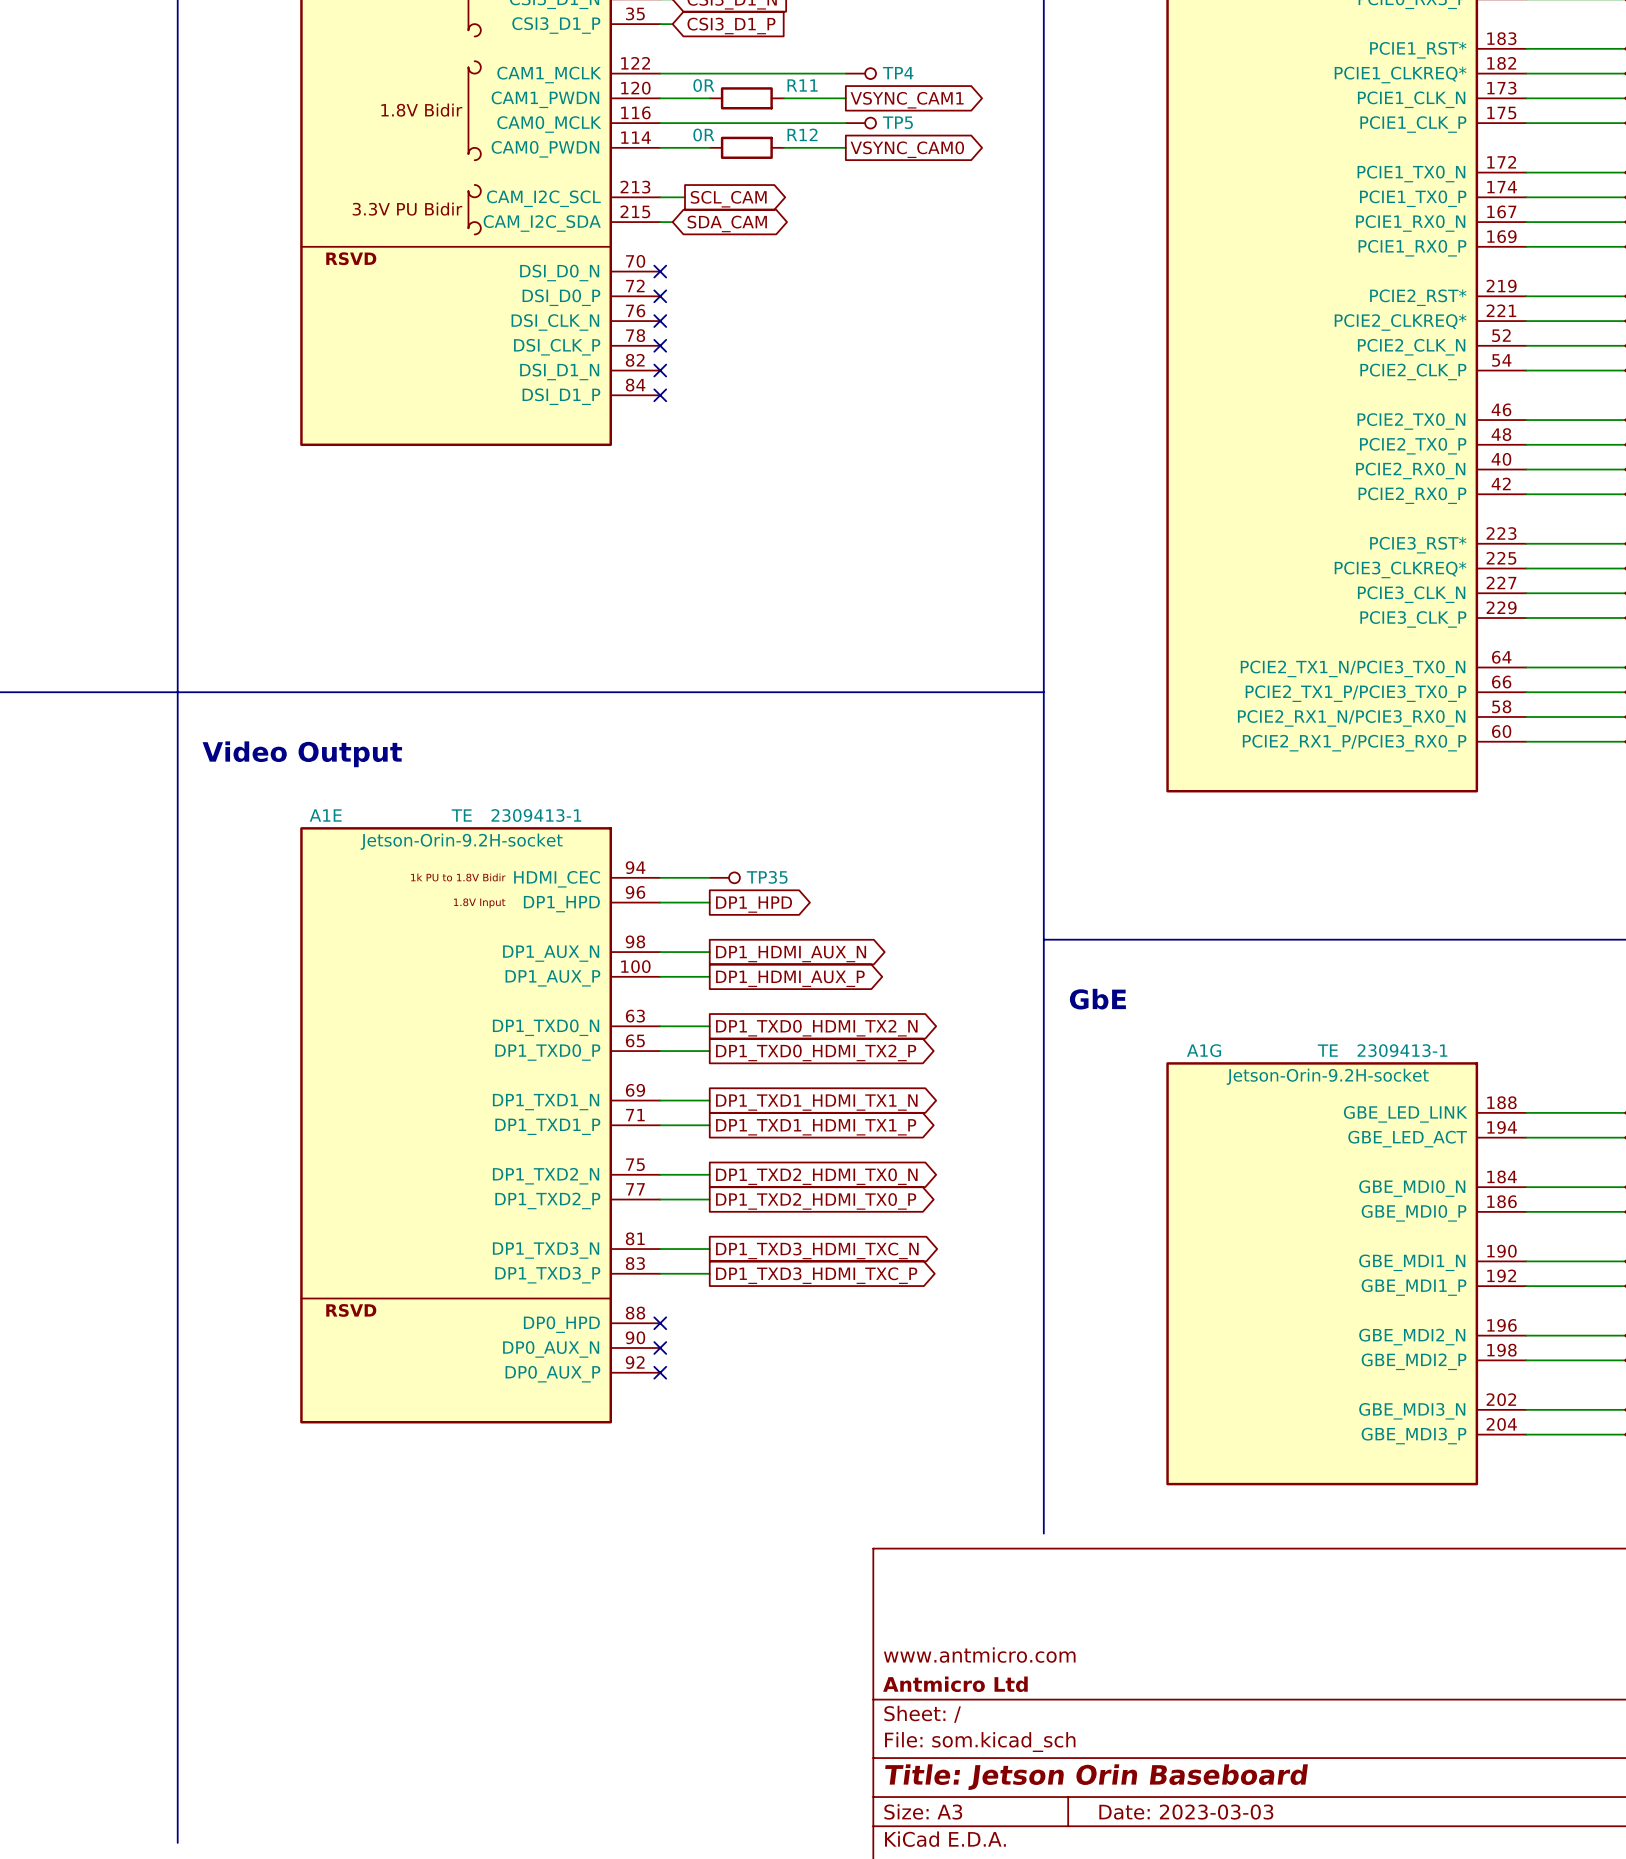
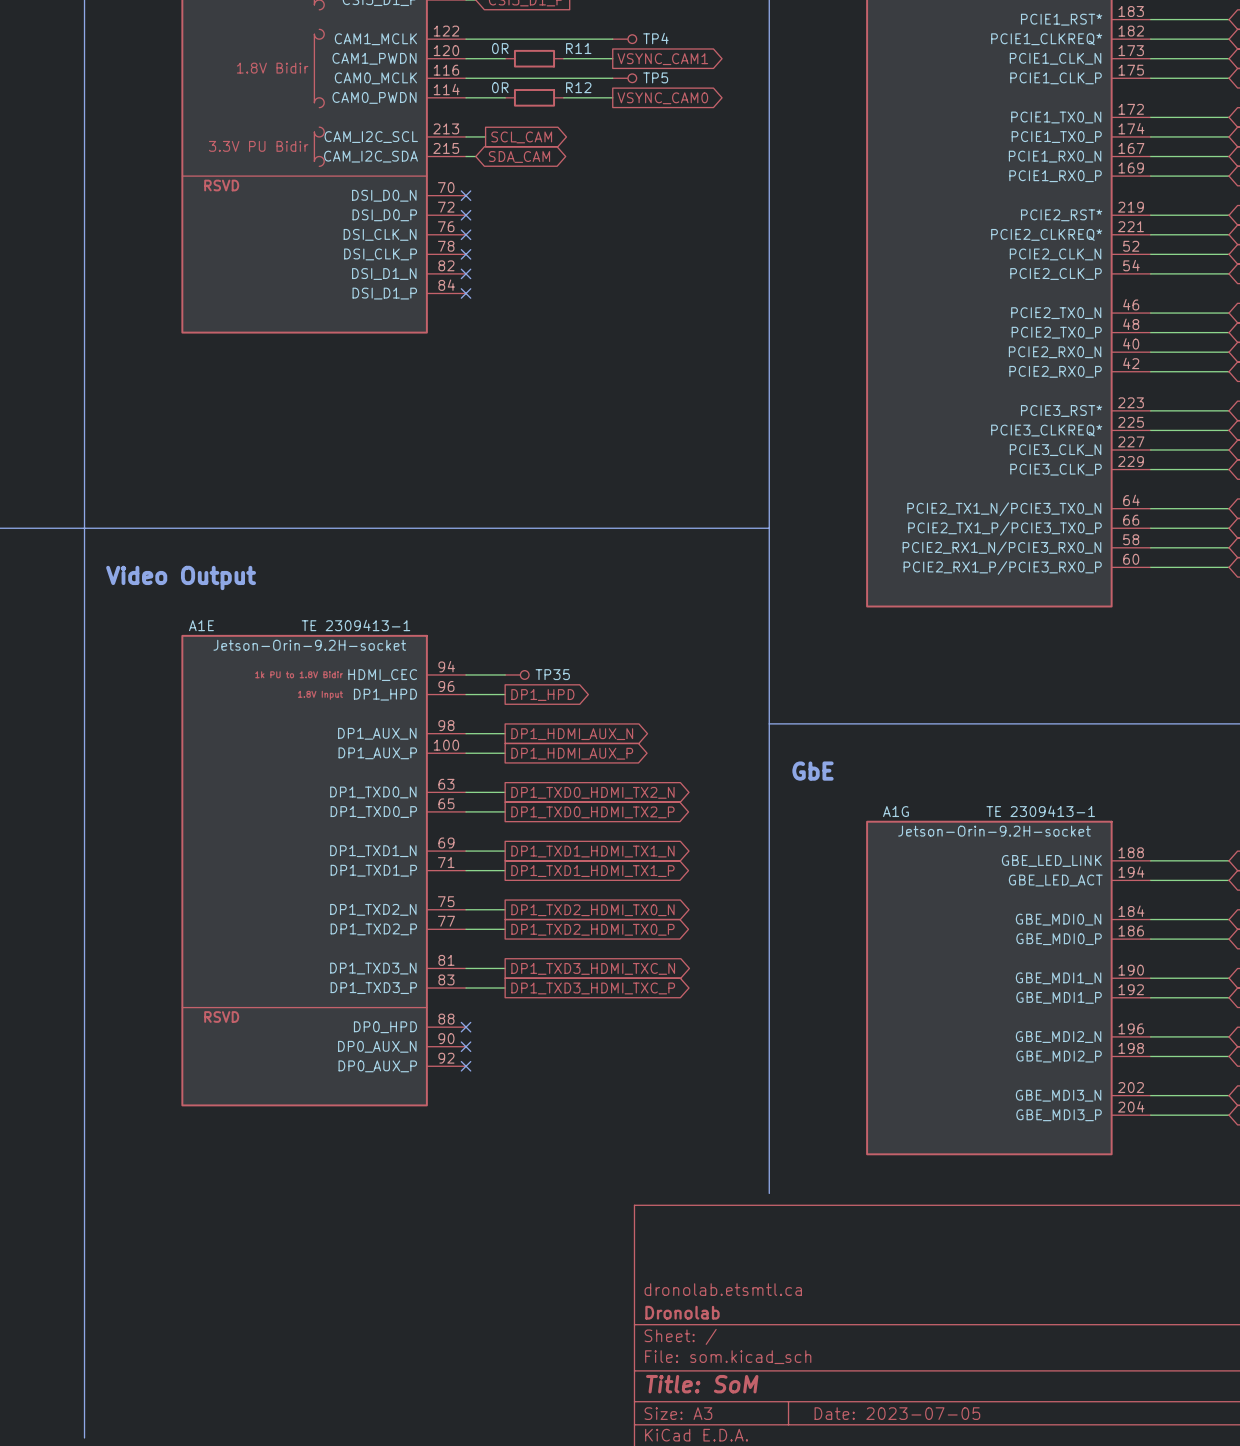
title block: www.antmicro.com (979, 1655) -> dronolab.etsmtl.ca (723, 1289)
title block: Antmicro Ltd (955, 1684) -> Dronolab (682, 1312)
title block: Title: Jetson Orin Baseboard (1096, 1777) -> Title: SoM (702, 1384)
title block: Date: 2023-03-03 (1186, 1812) -> Date: 2023-07-05 (897, 1413)

